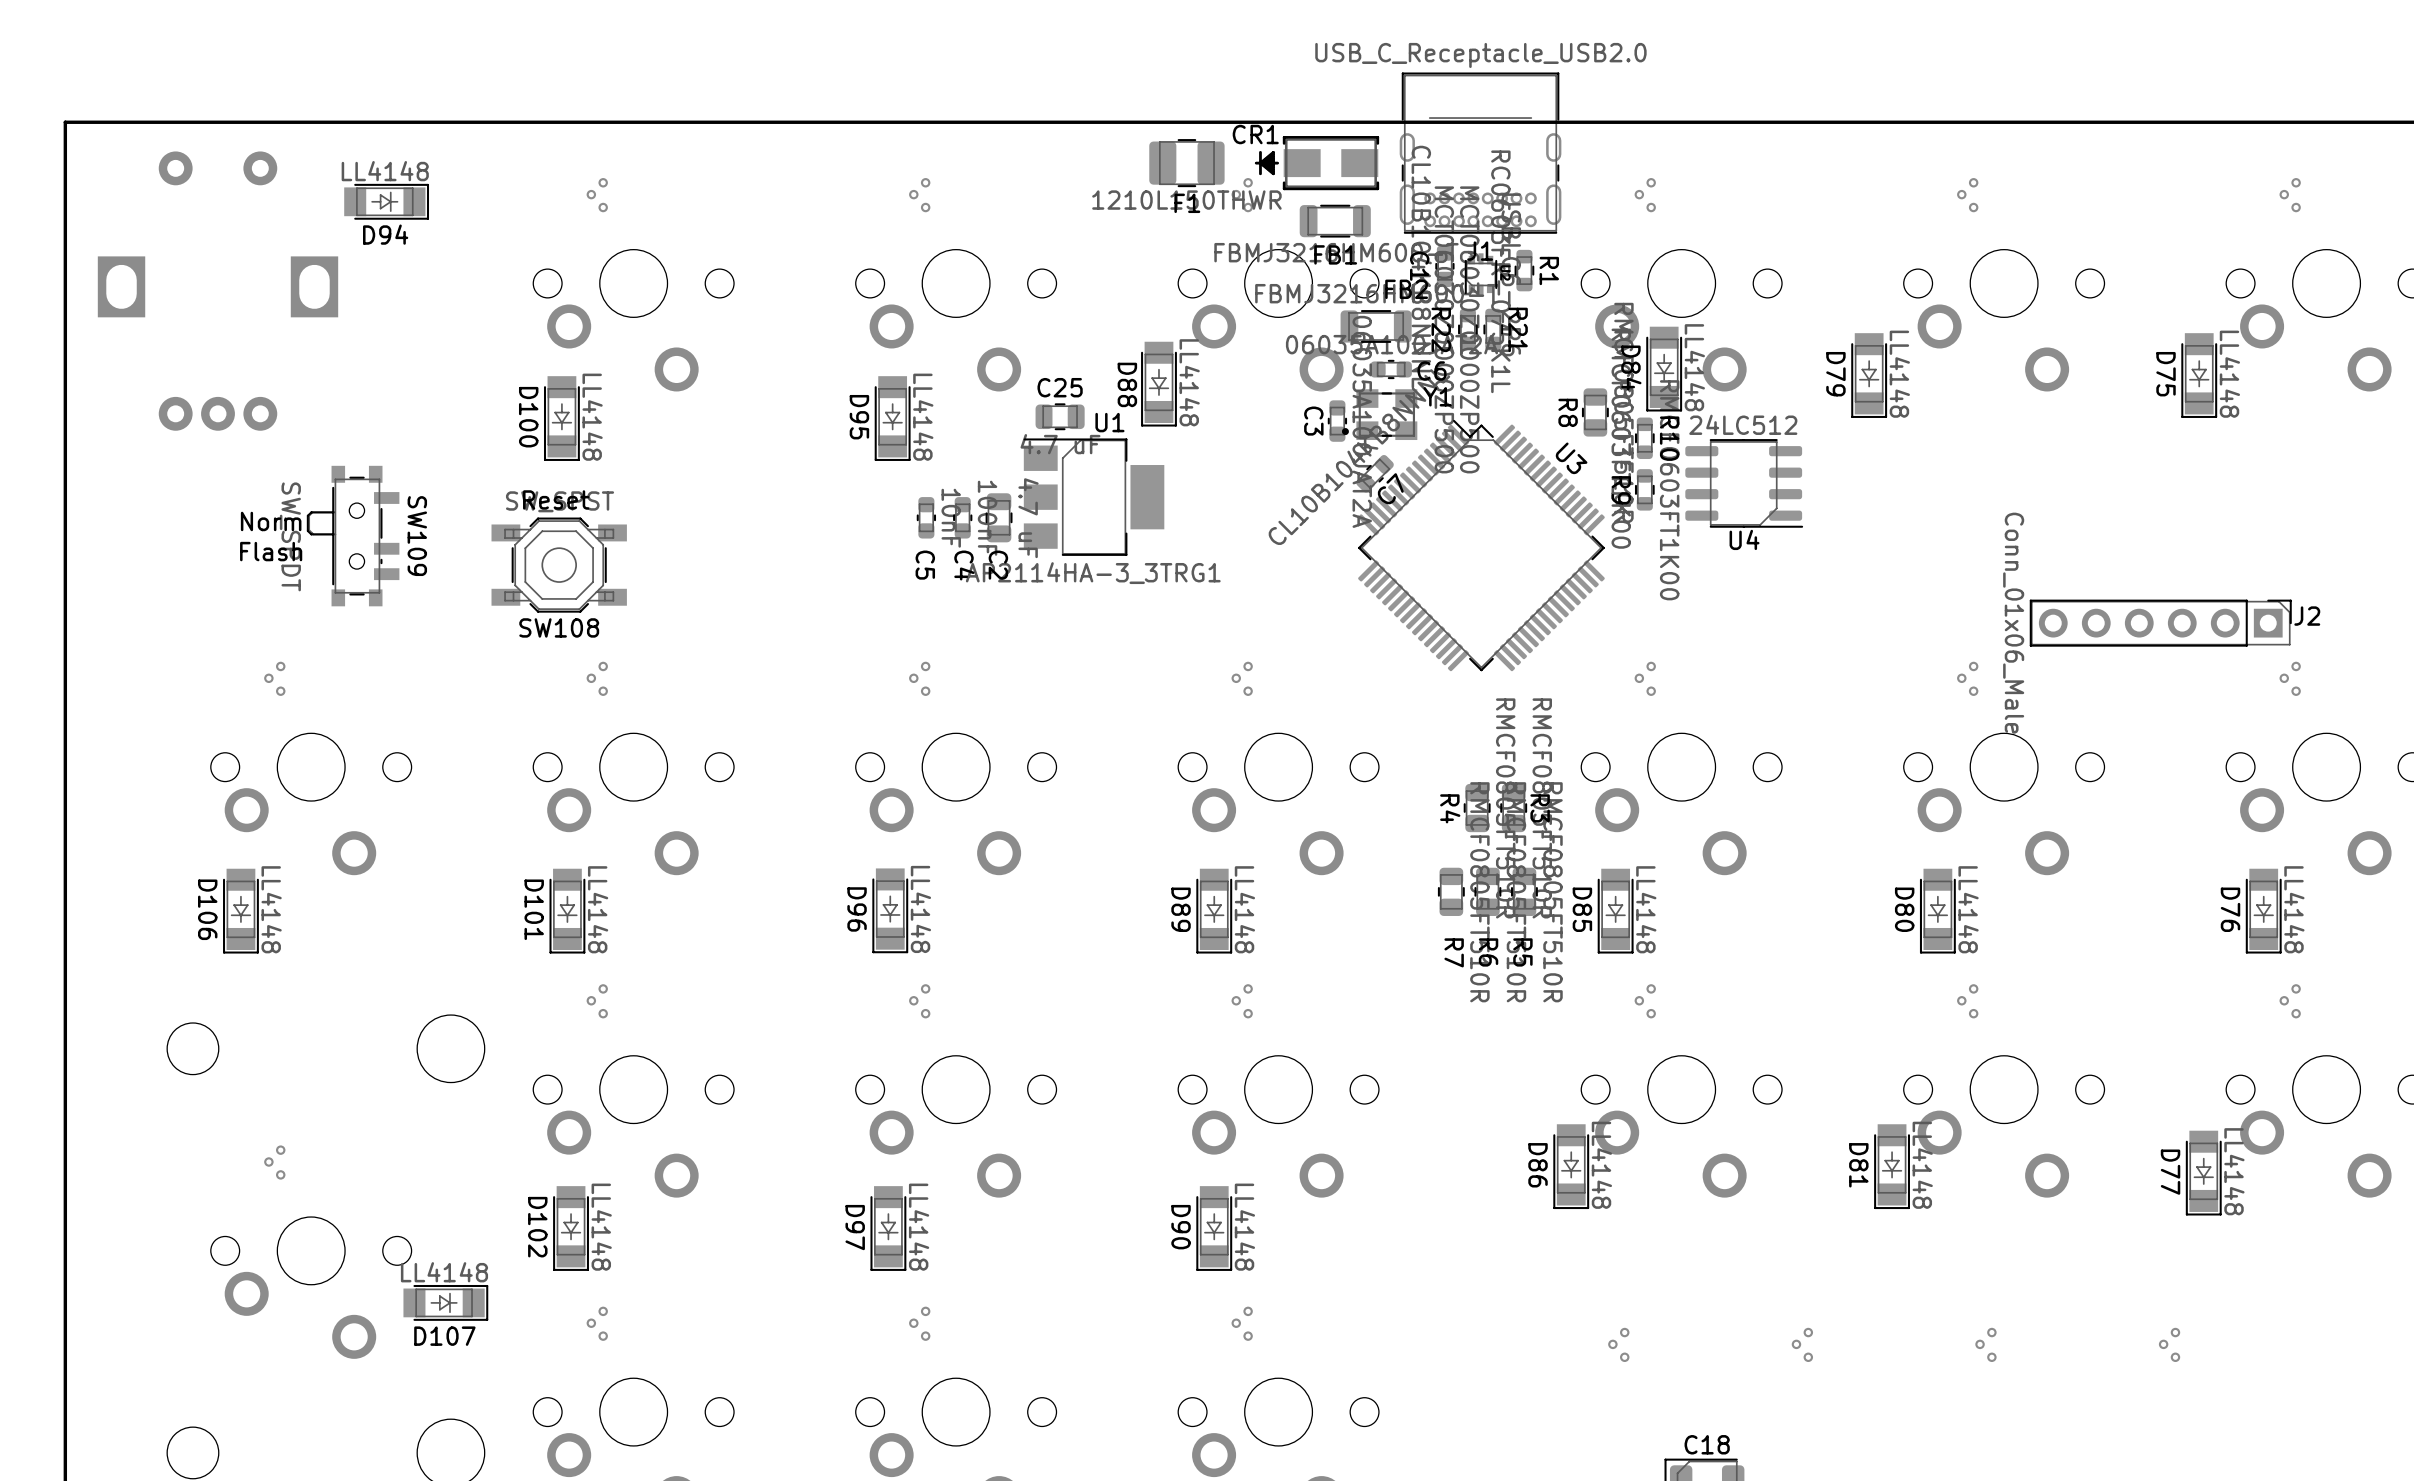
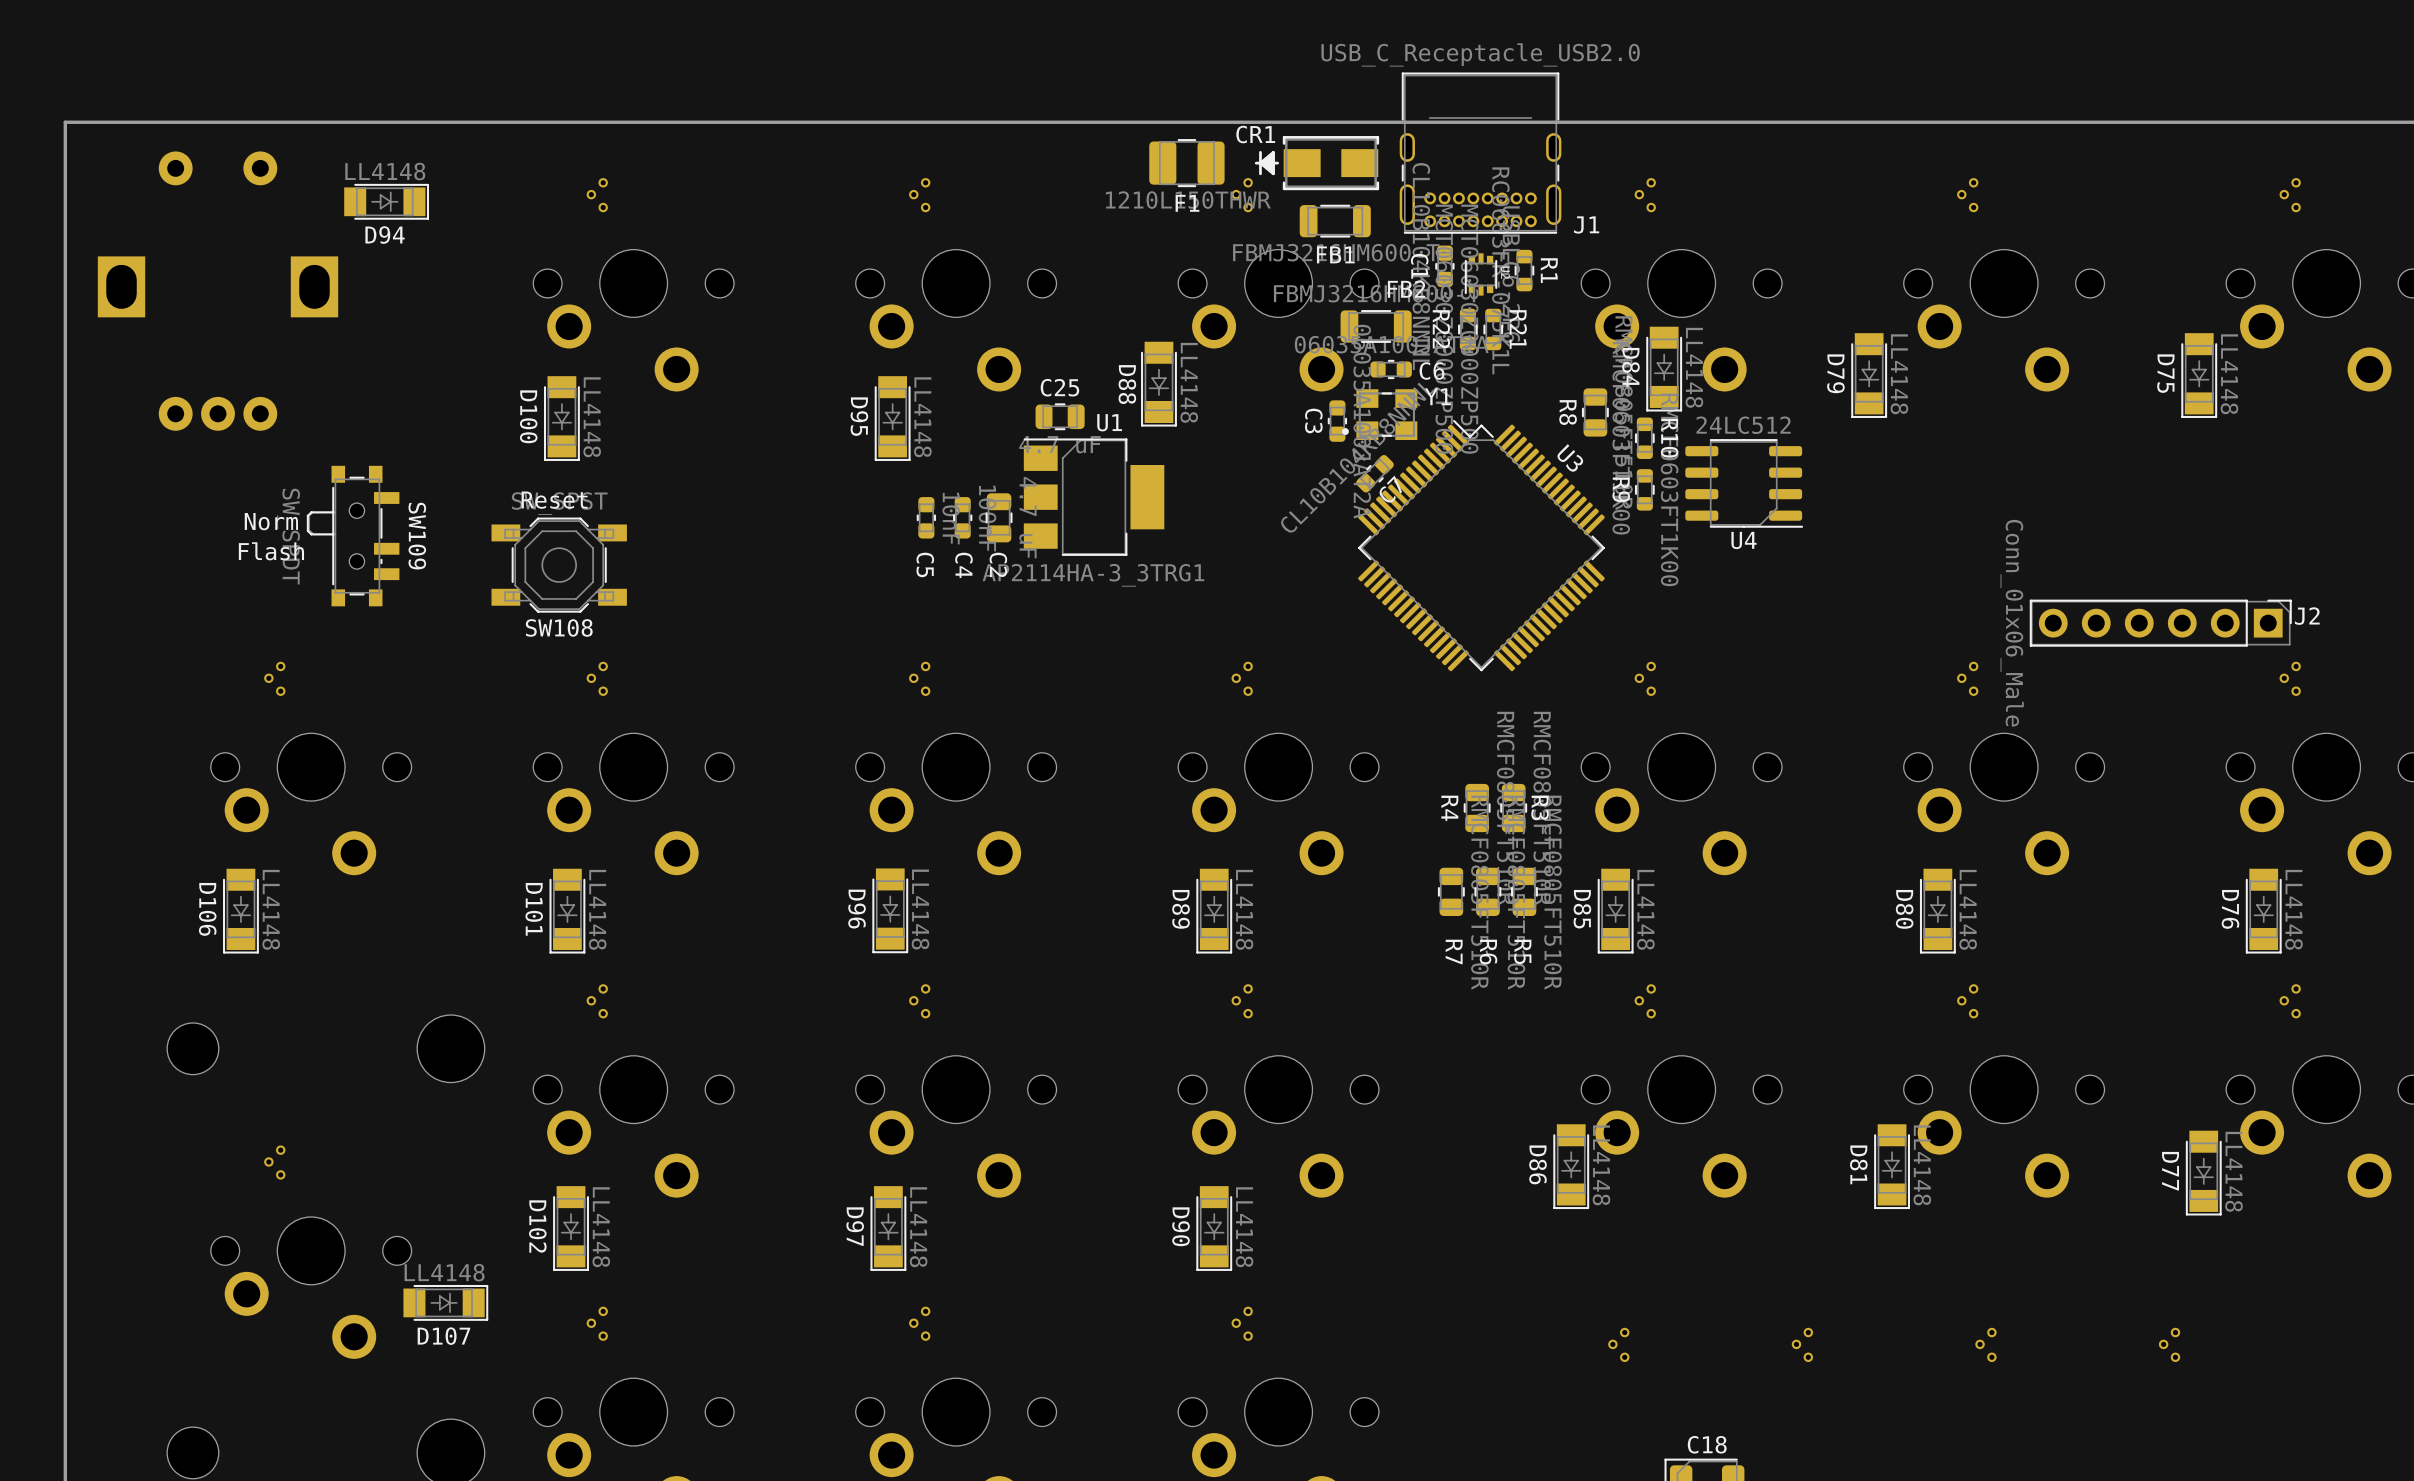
J1 name position: J1 (1480, 251) -> J1 (1586, 224)

